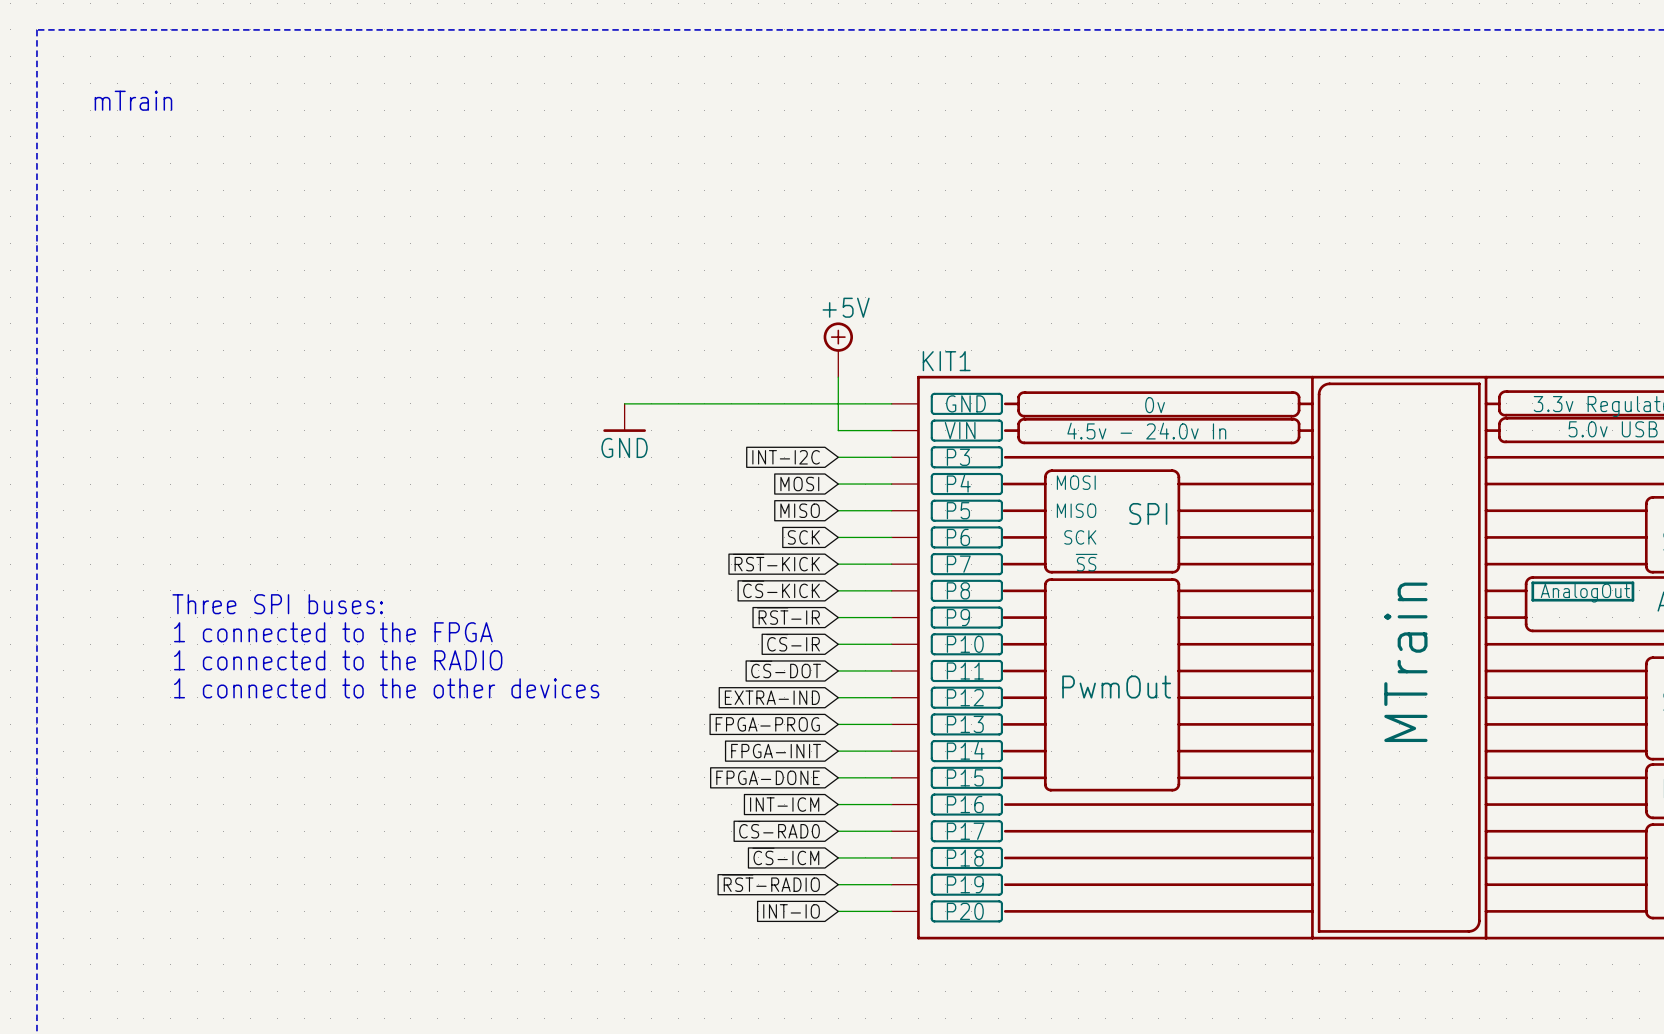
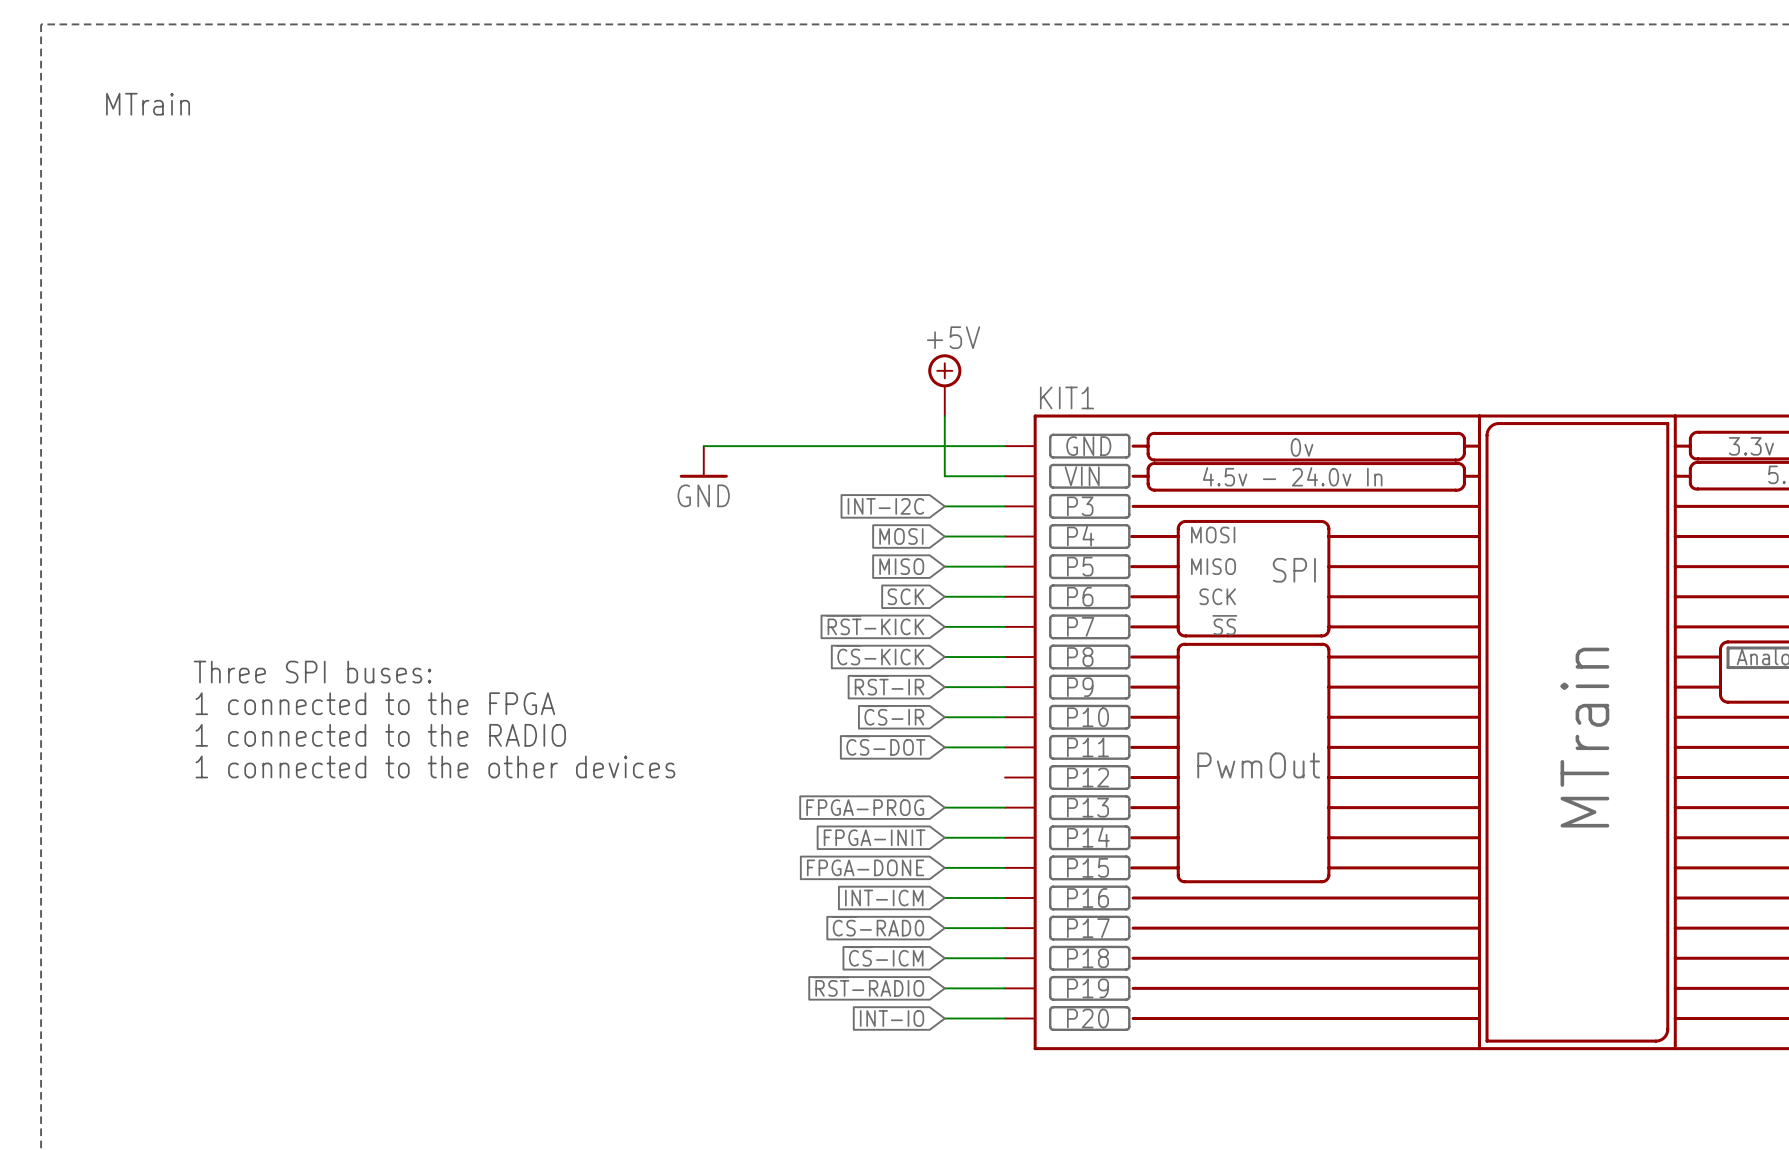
text: mTrain (133, 100) -> MTrain (148, 104)
global label: EXTRA-IND (772, 697) -> none
wire: (838, 697) (891, 697) -> none

